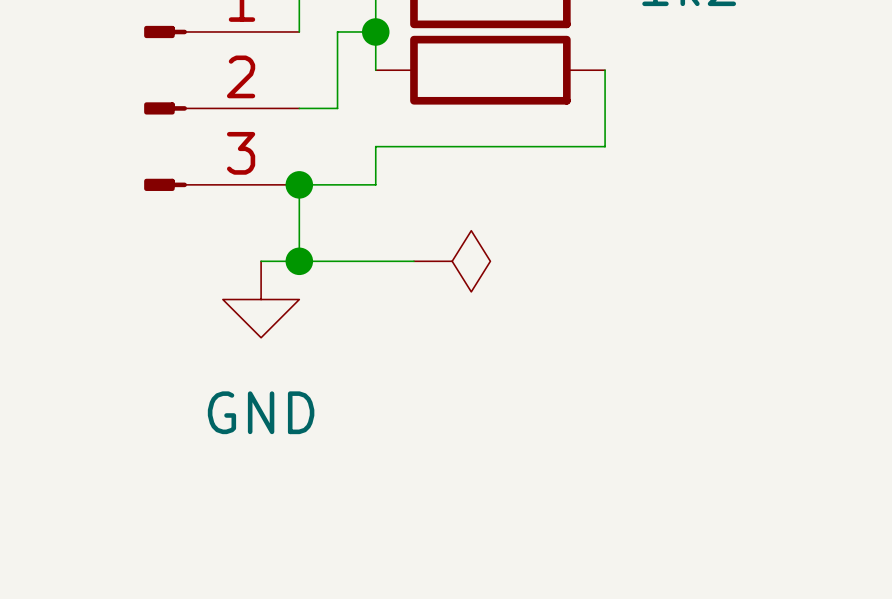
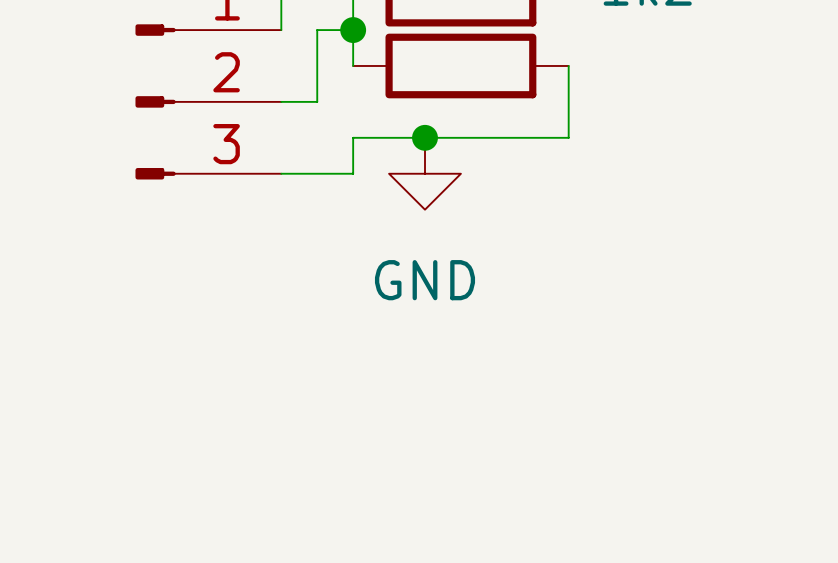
junction: none -> (425, 137)
wire: (299, 184) (299, 261) -> none
junction: (299, 184) -> none
wire: (261, 261) (413, 261) -> none
junction: (299, 261) -> none
power symbol: (452, 261) -> none
power symbol position: GND (261, 299) -> GND (425, 173)

